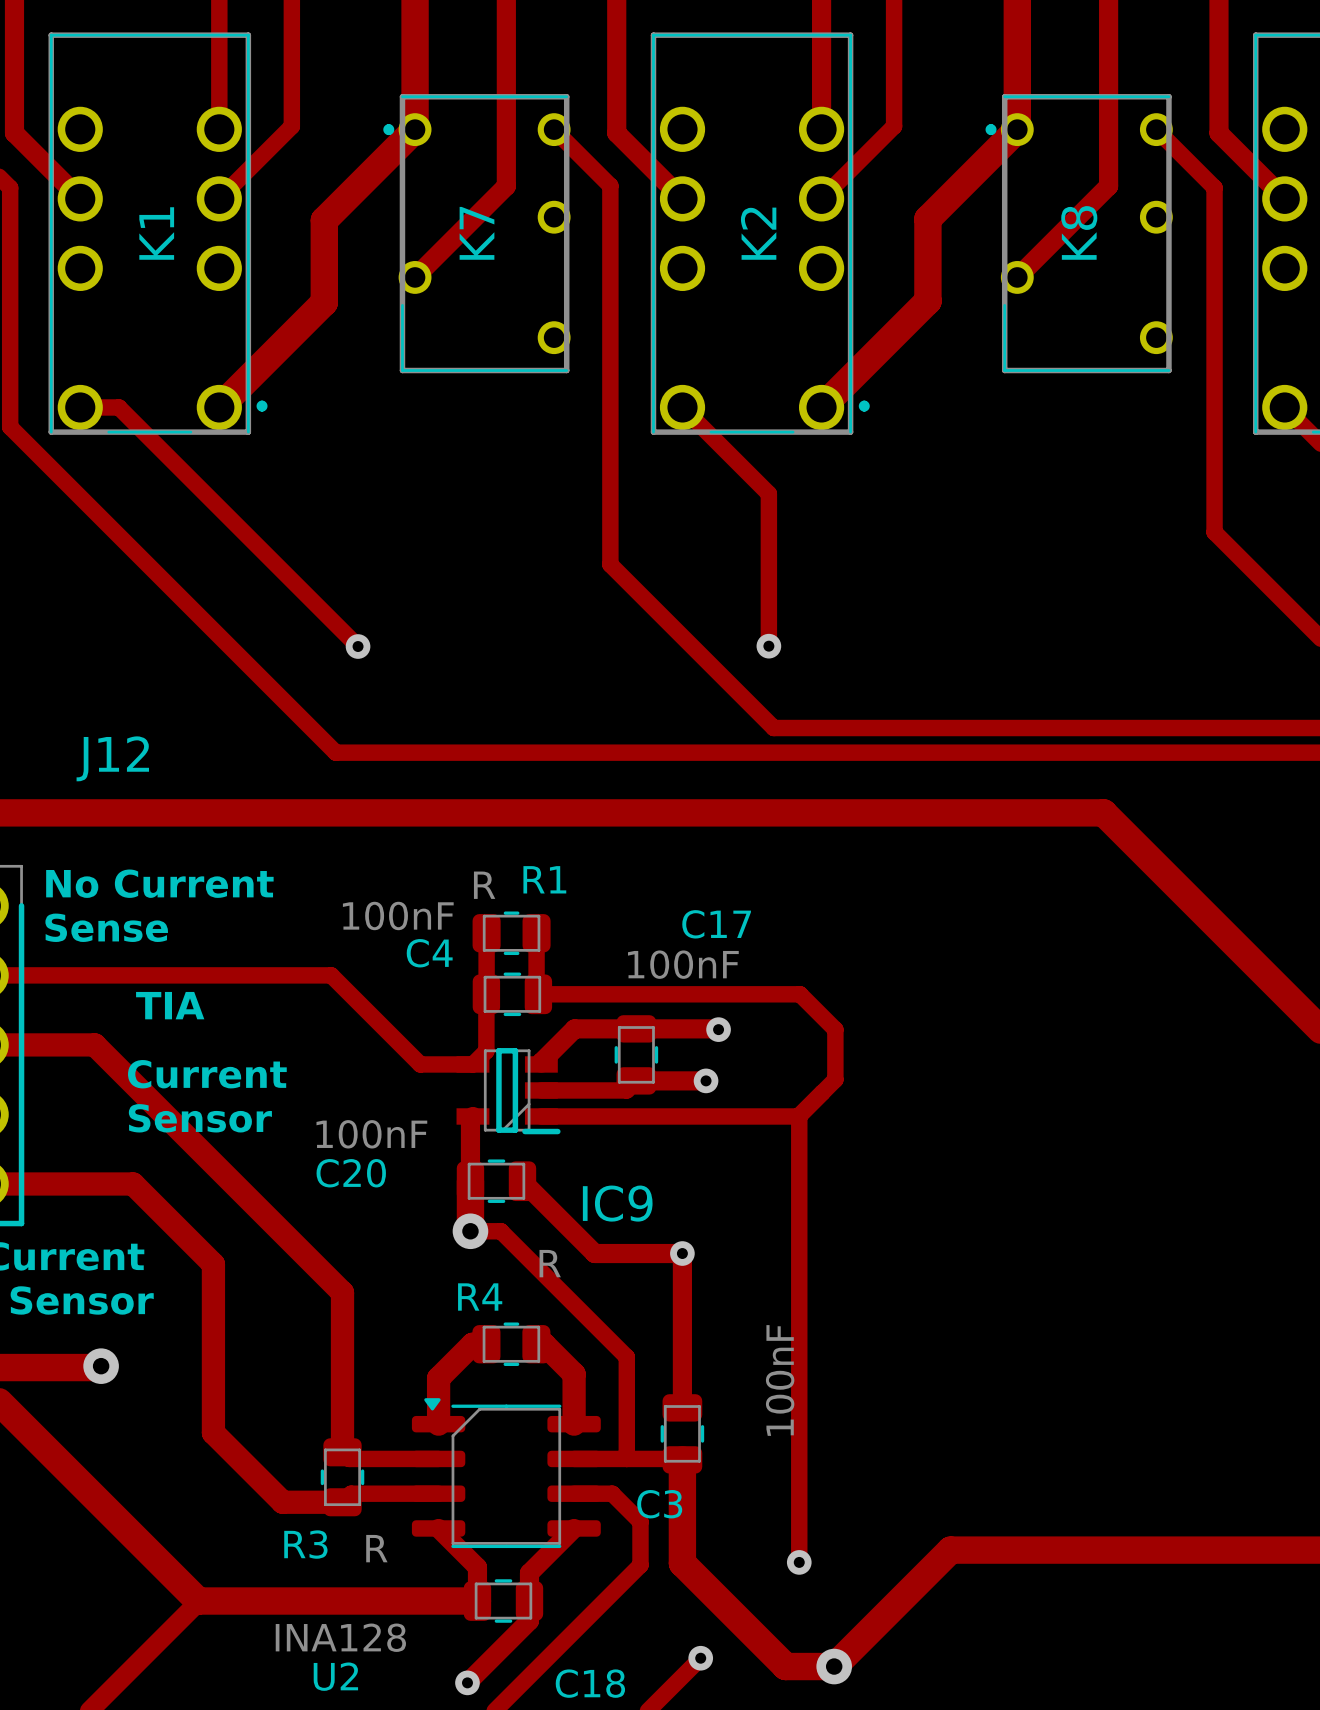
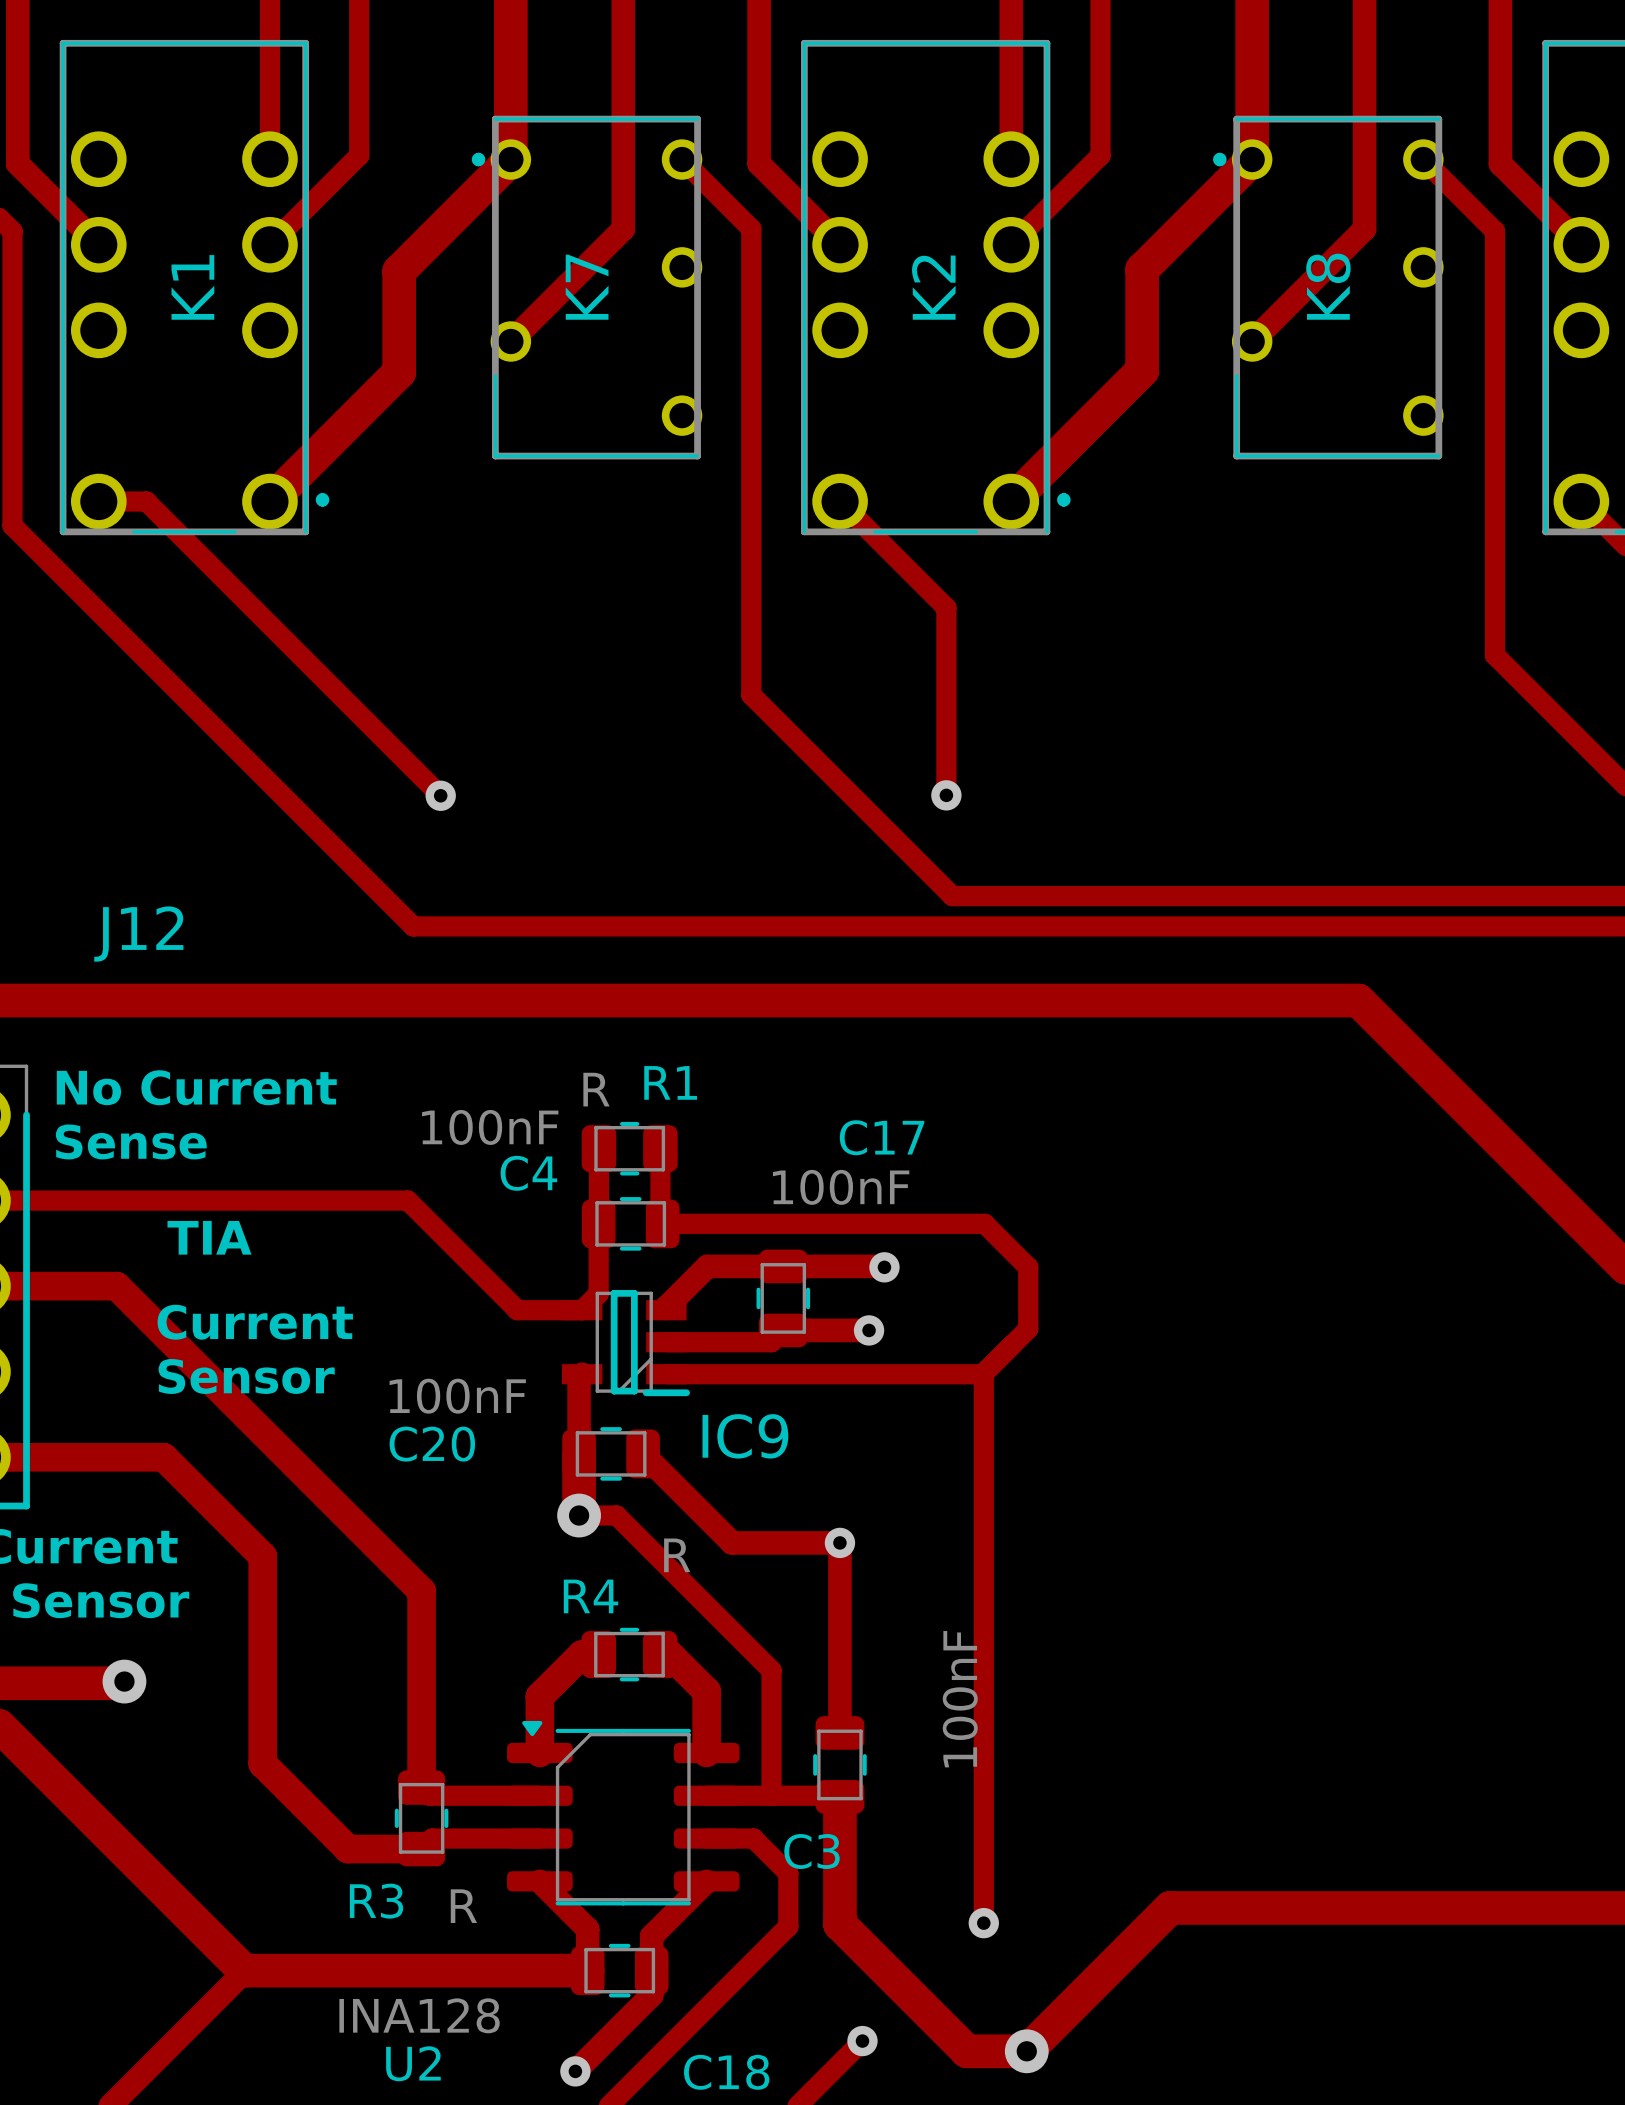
IC9 name position: IC9 (617, 1203) -> IC9 (745, 1436)

